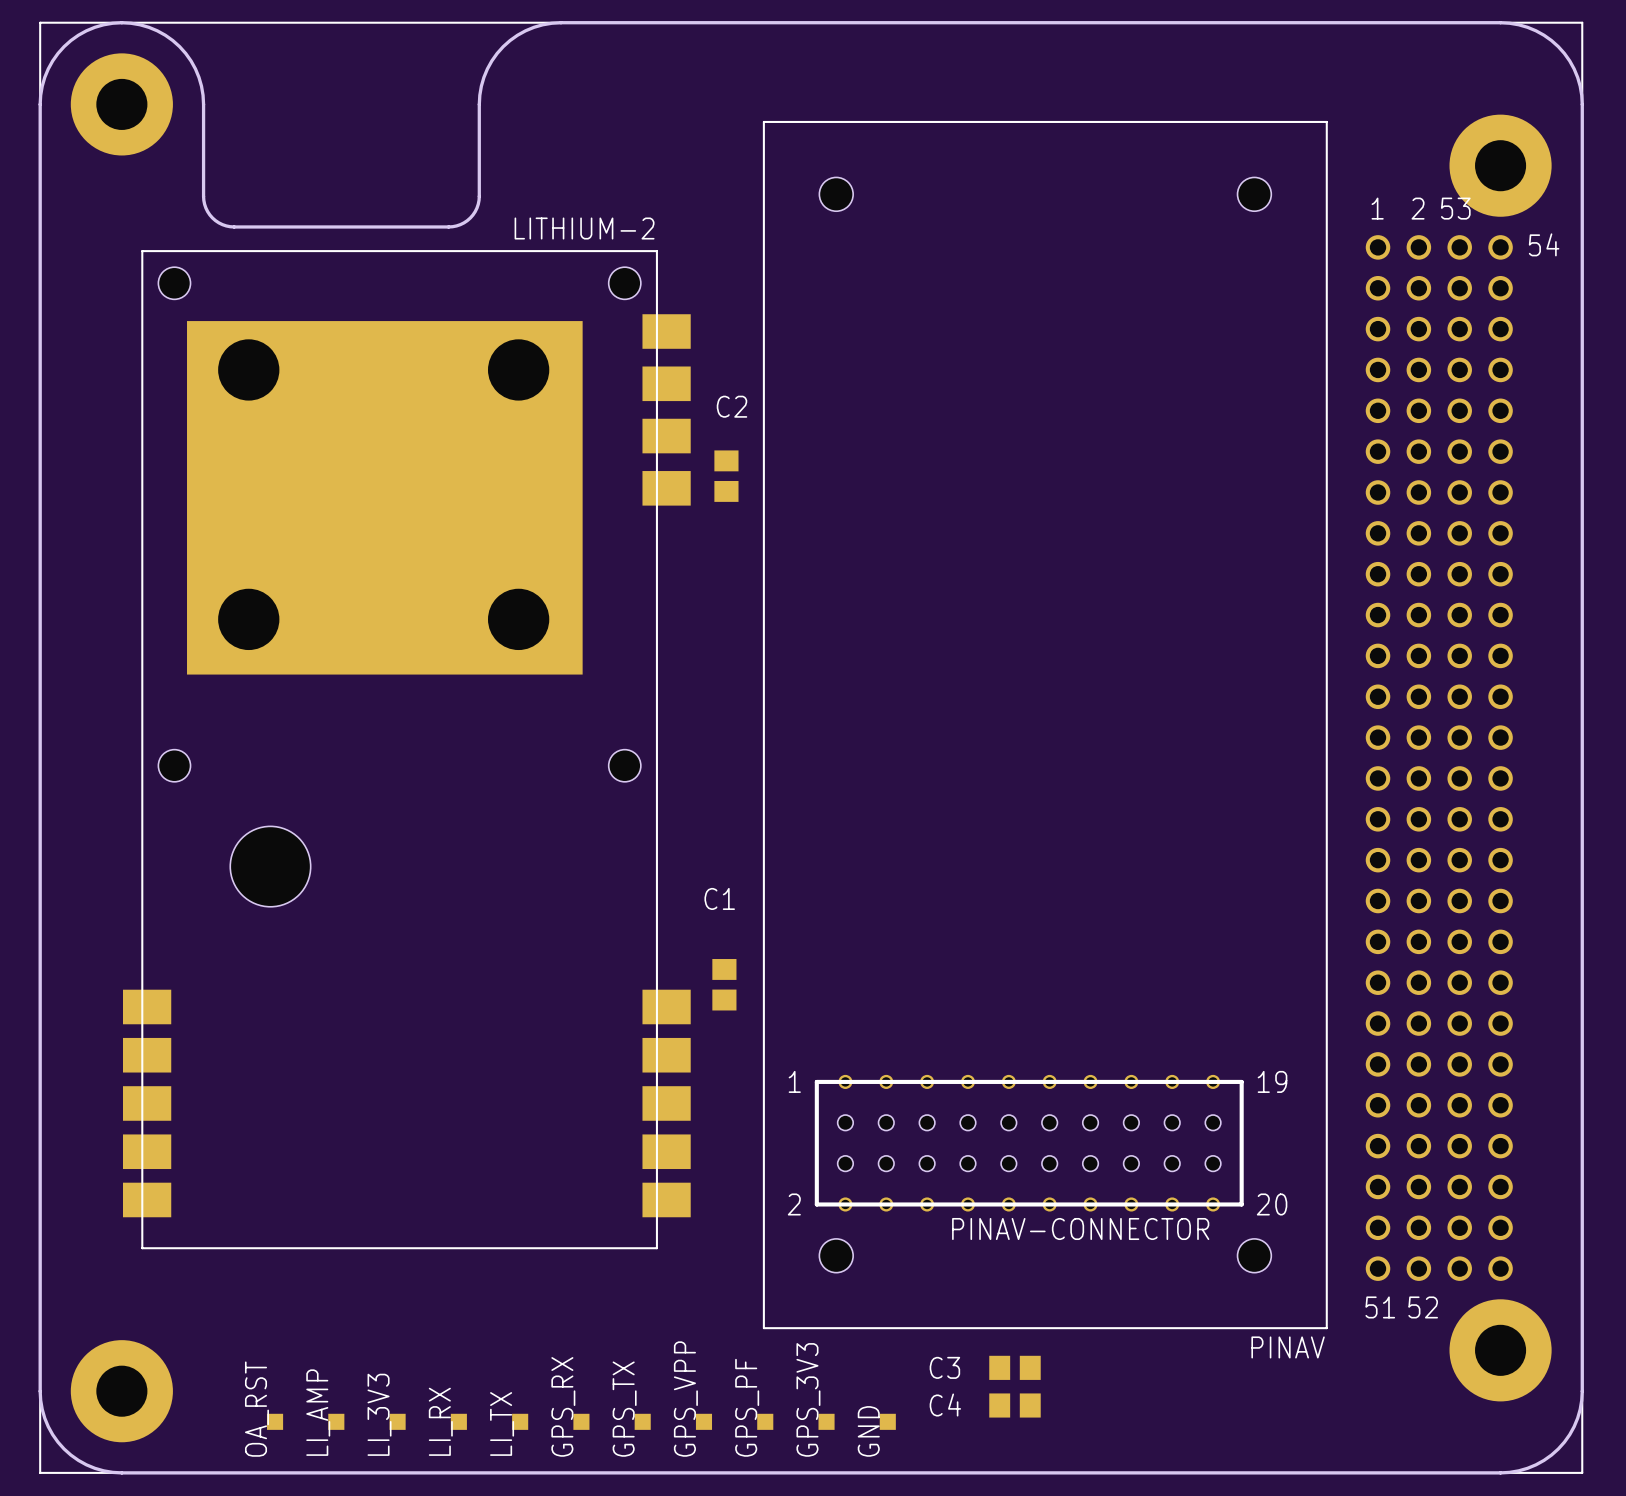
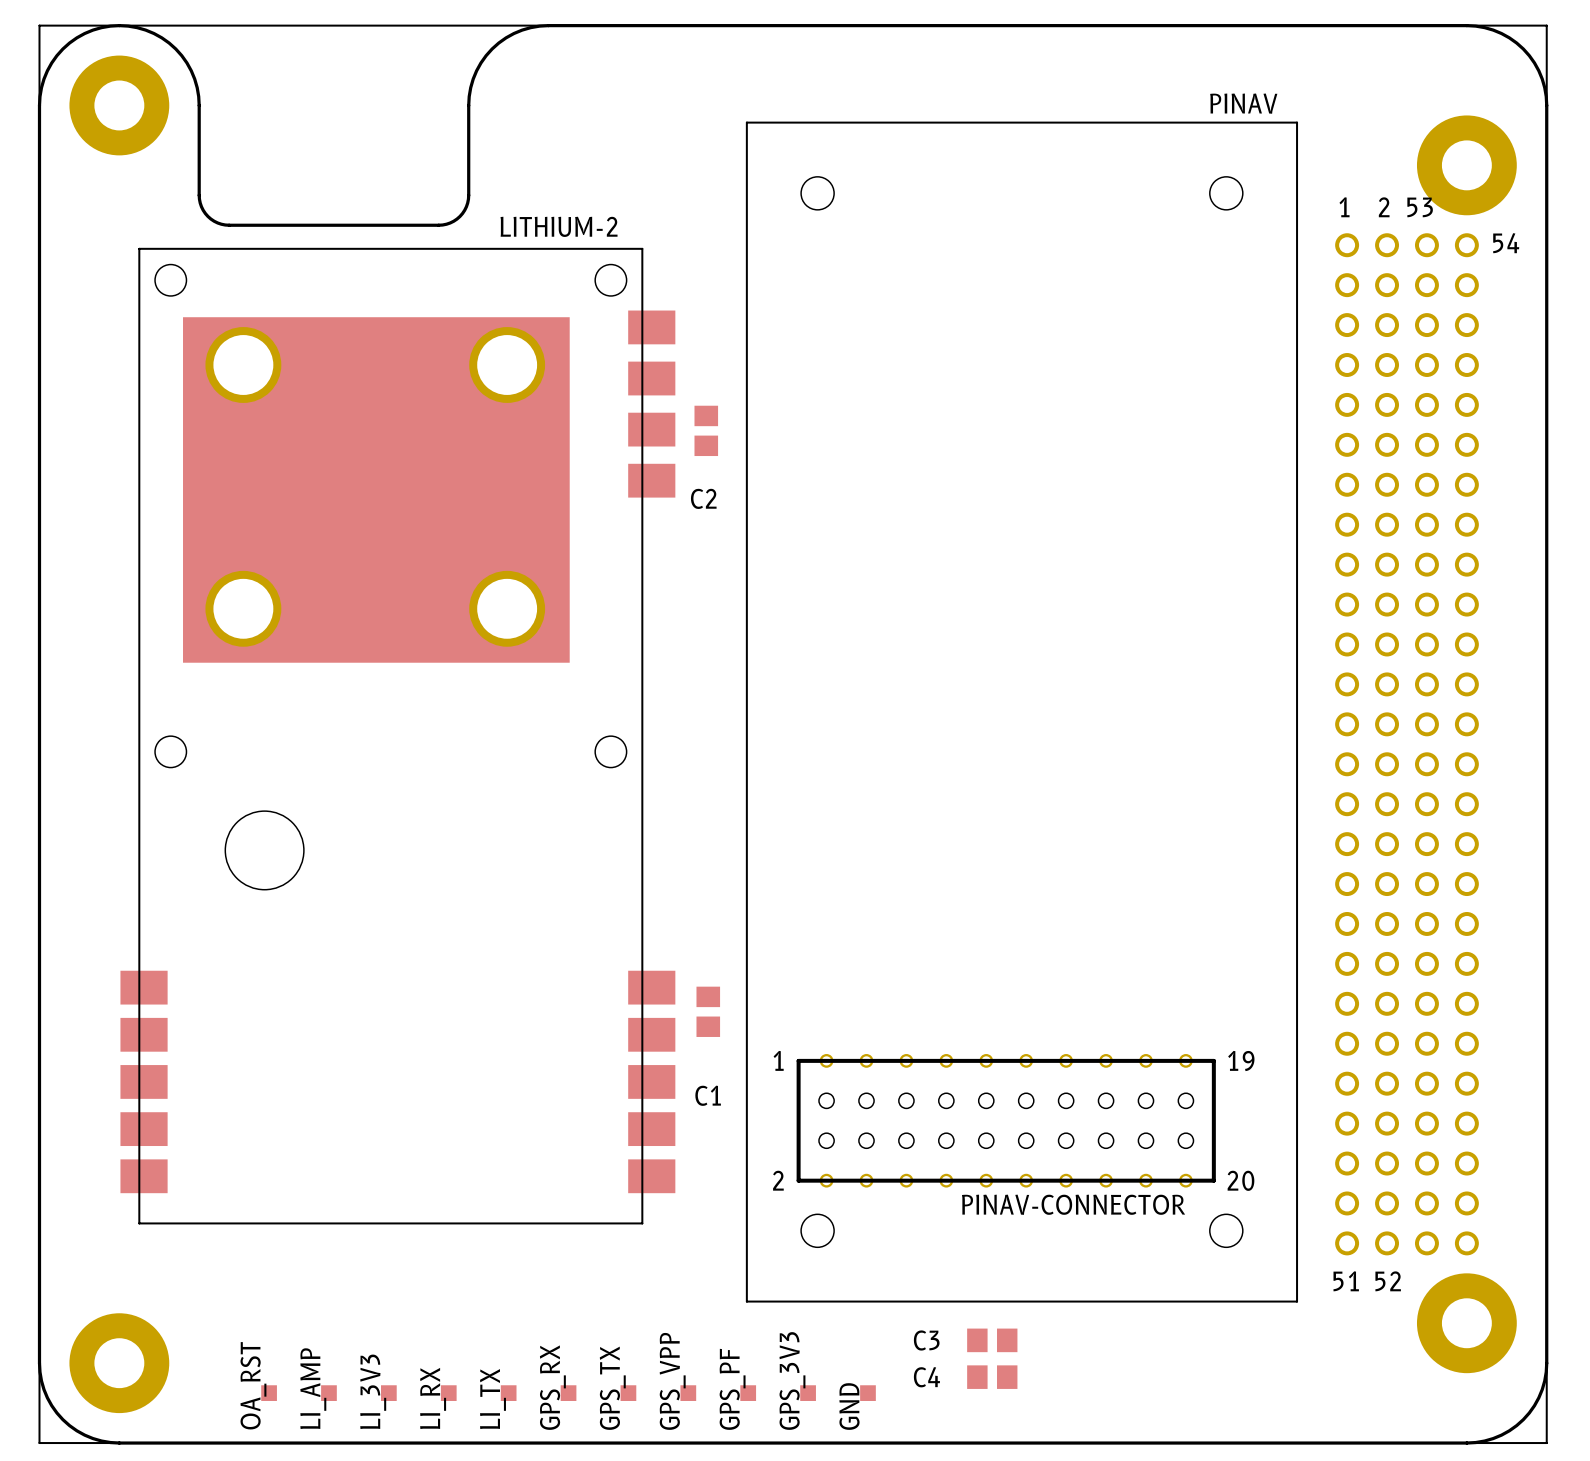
C2 name position: C2 (731, 406) -> C2 (703, 498)
C2 position: (726, 476) -> (706, 430)
C1 name position: C1 (719, 898) -> C1 (708, 1095)
C1 position: (724, 984) -> (708, 1011)
PINAV name position: PINAV (1288, 1347) -> PINAV (1243, 103)

